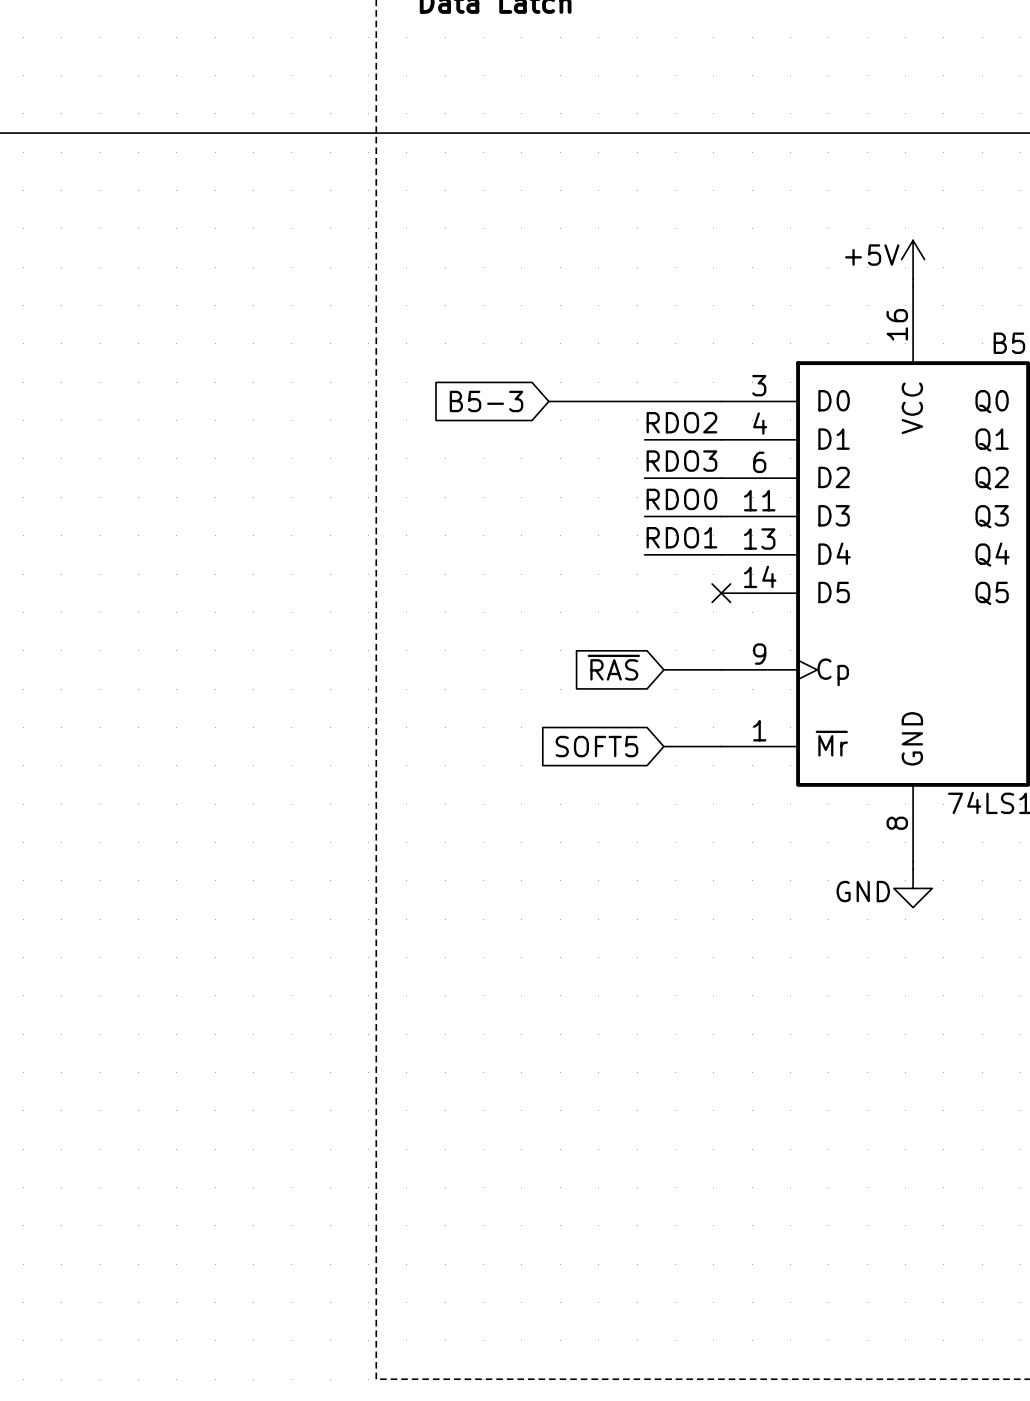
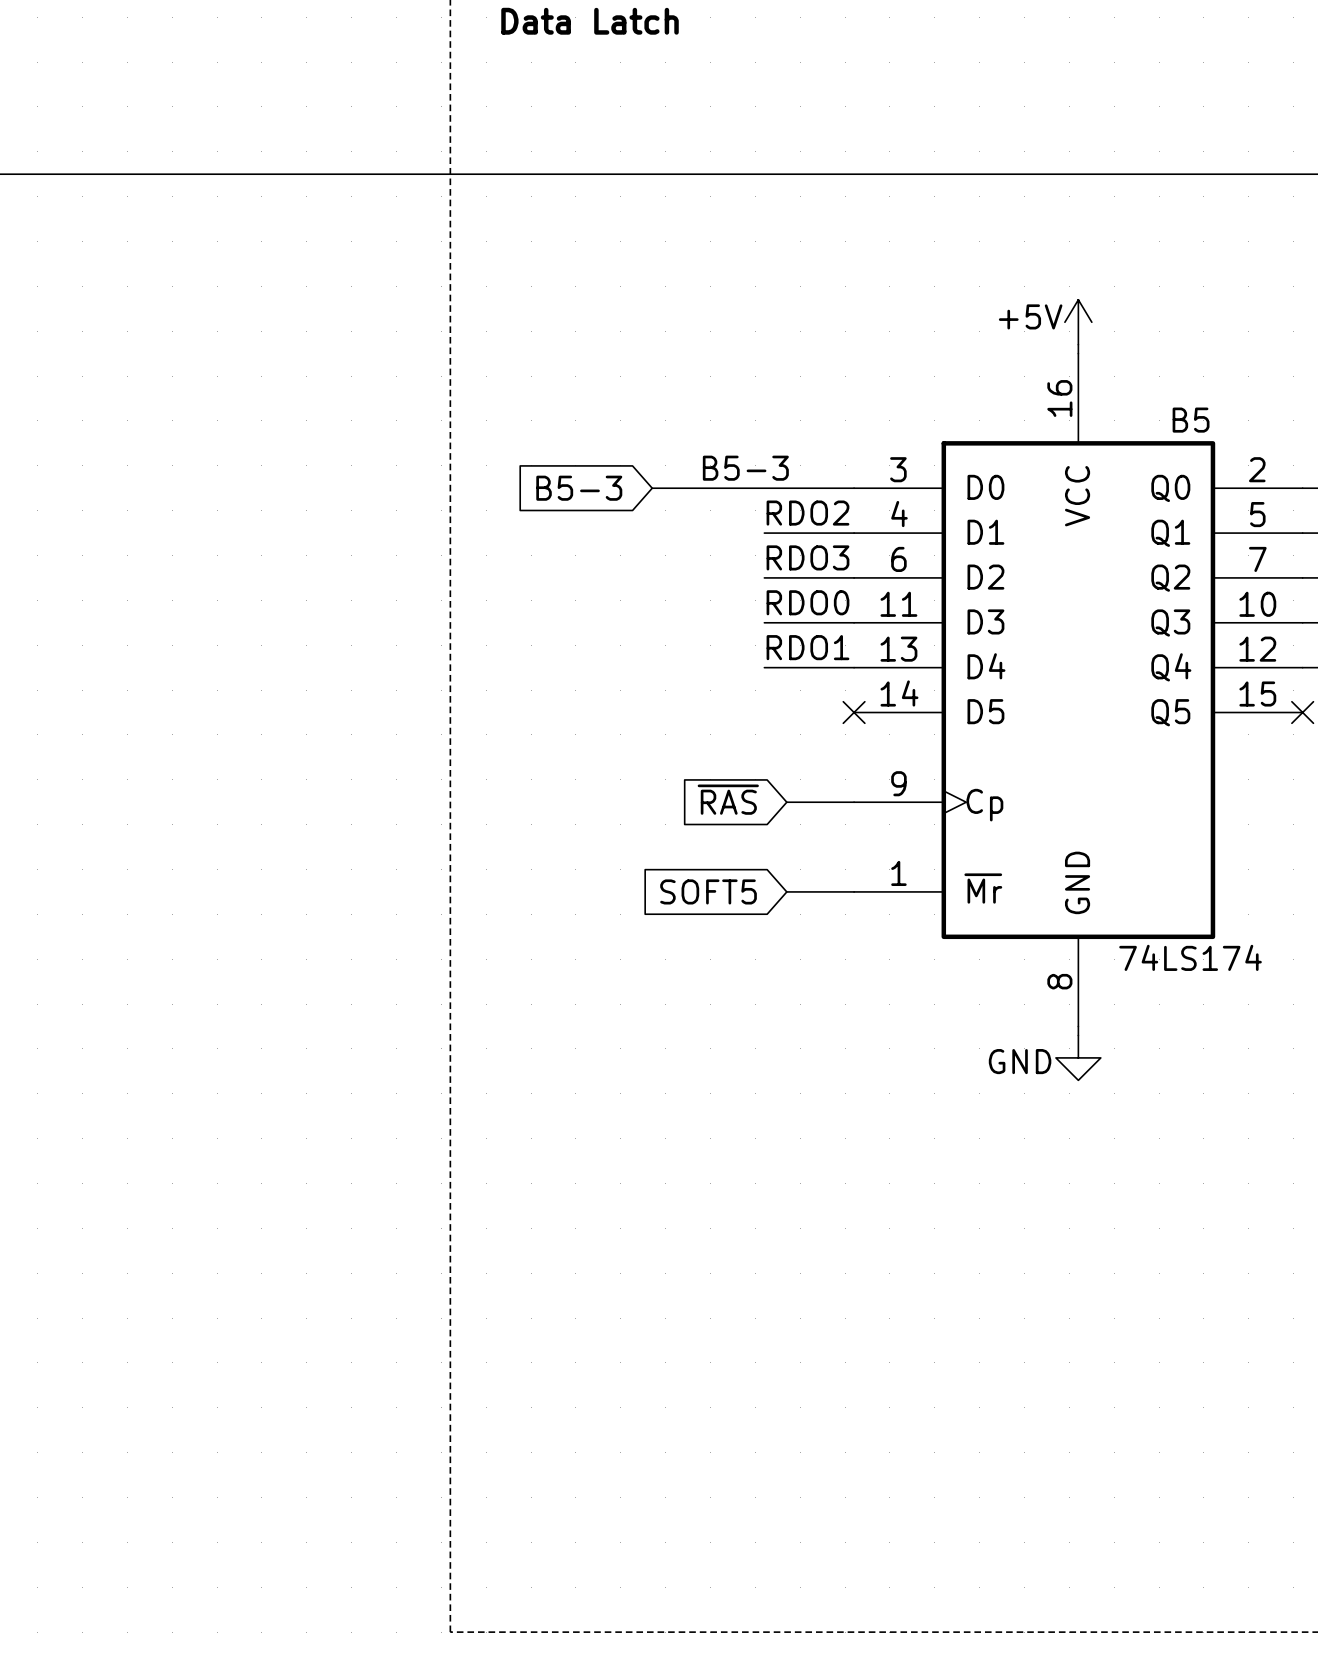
label: none -> B5-3 (745, 468)

